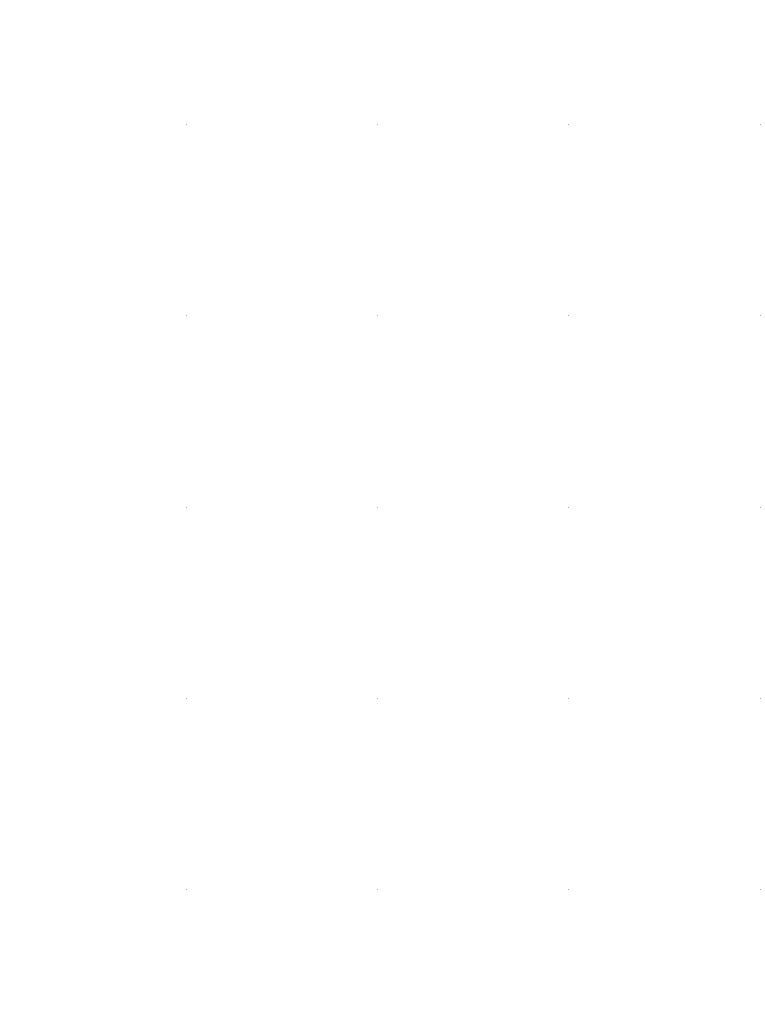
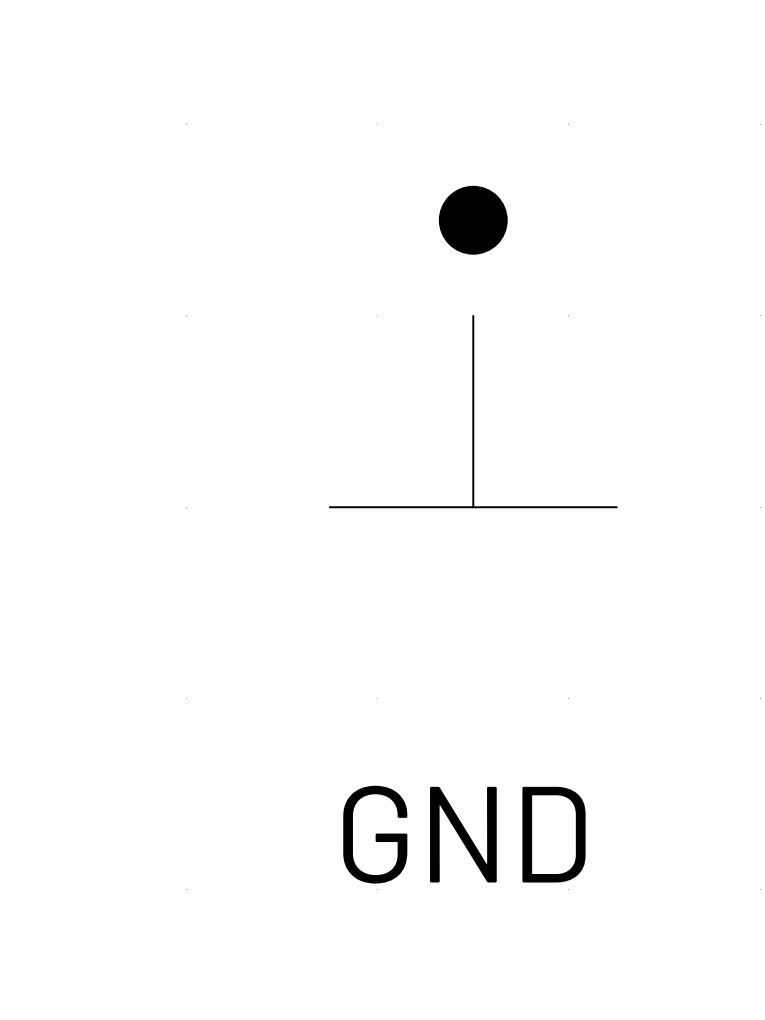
junction: none -> (473, 220)
power symbol: none -> GND (473, 411)

